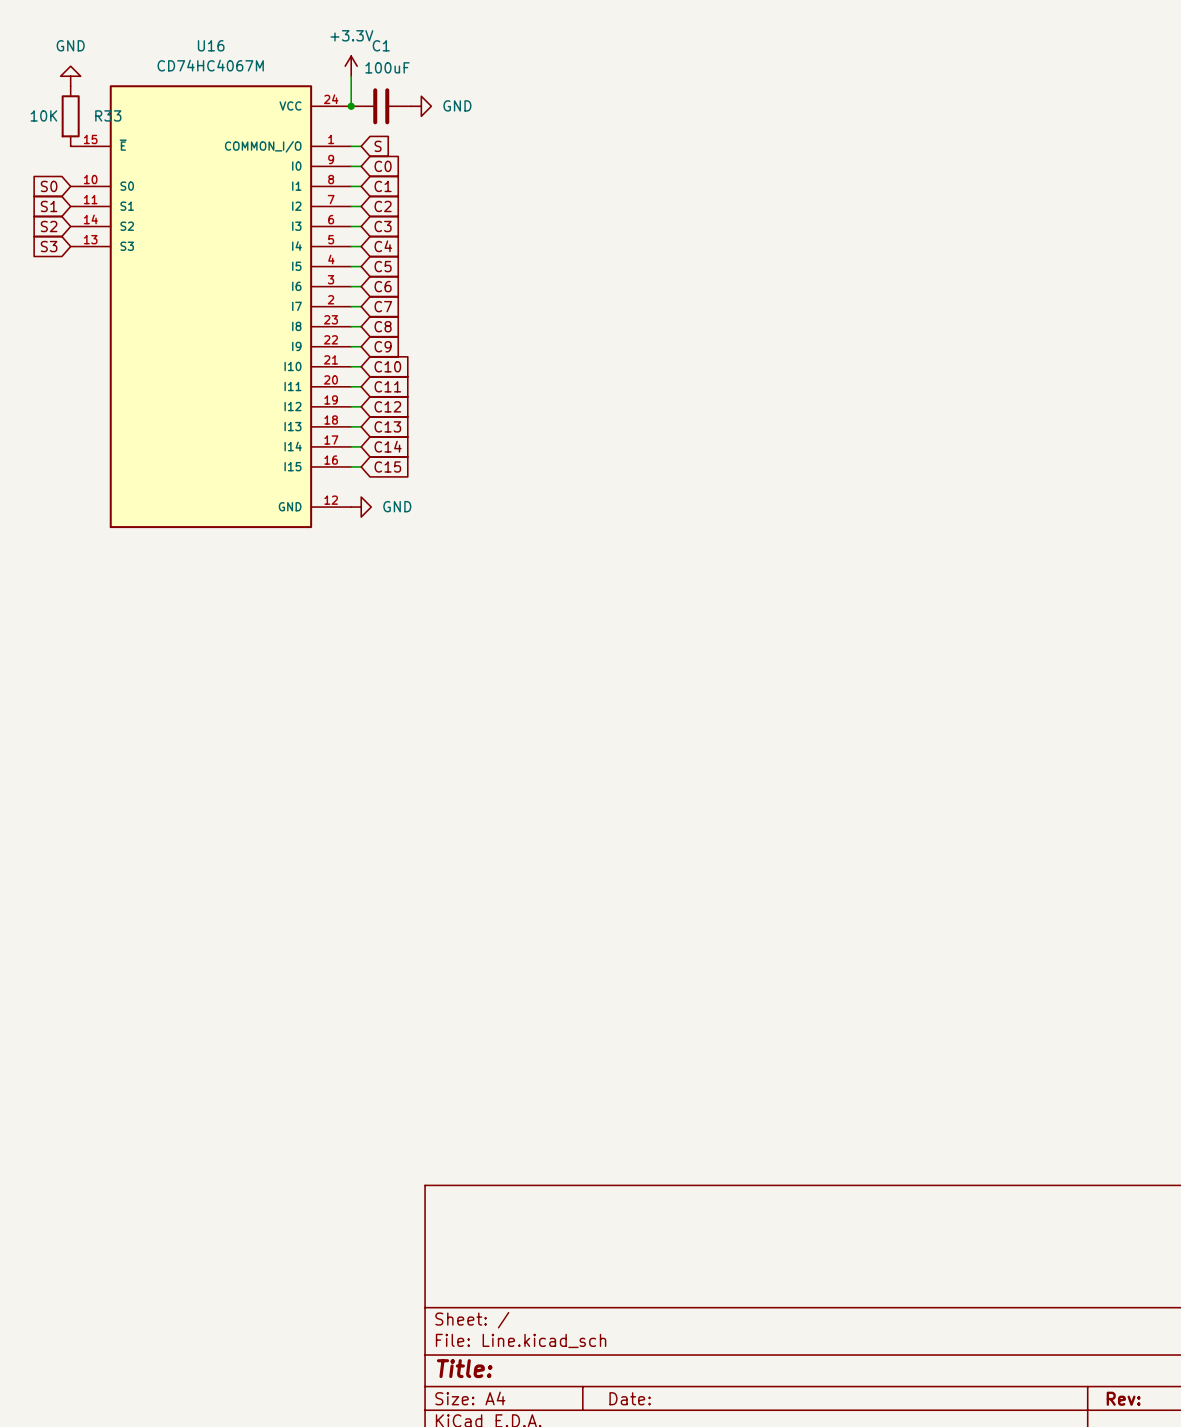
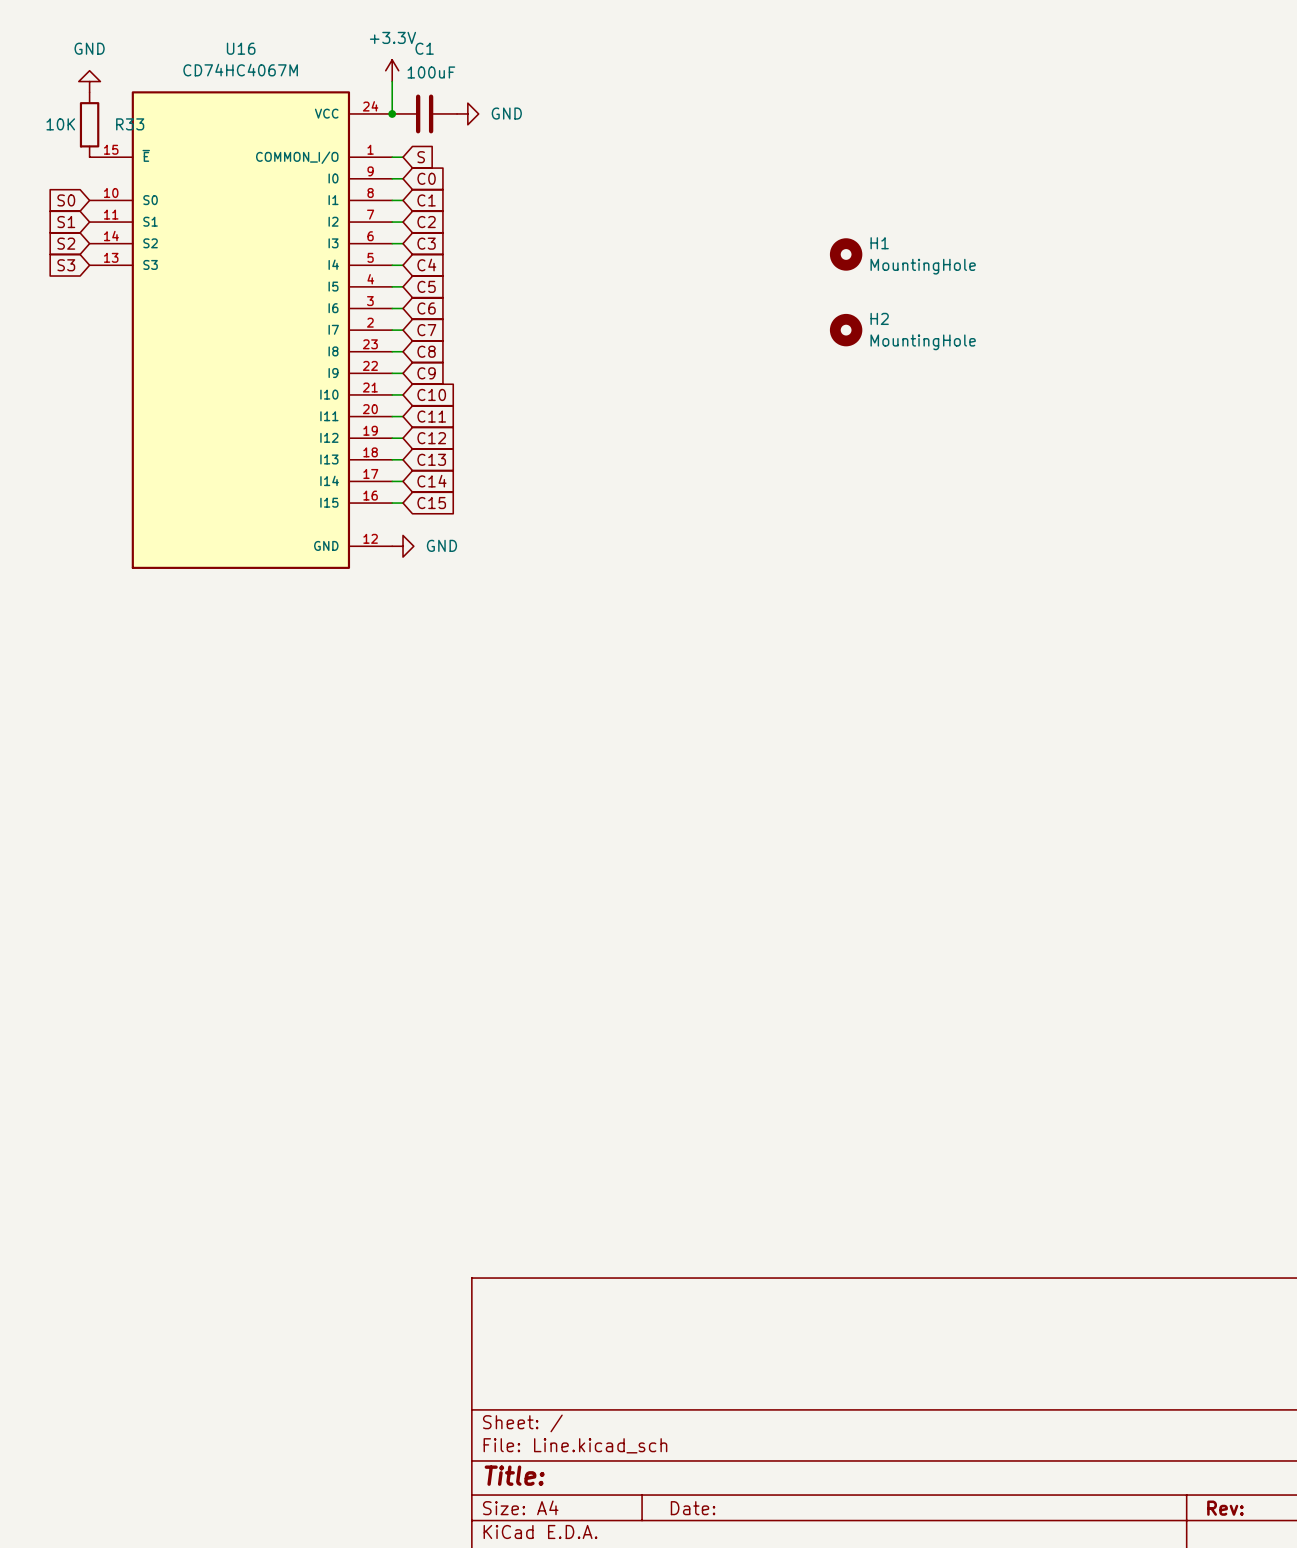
H1: none -> MountingHole (846, 254)
H2: none -> MountingHole (846, 330)

